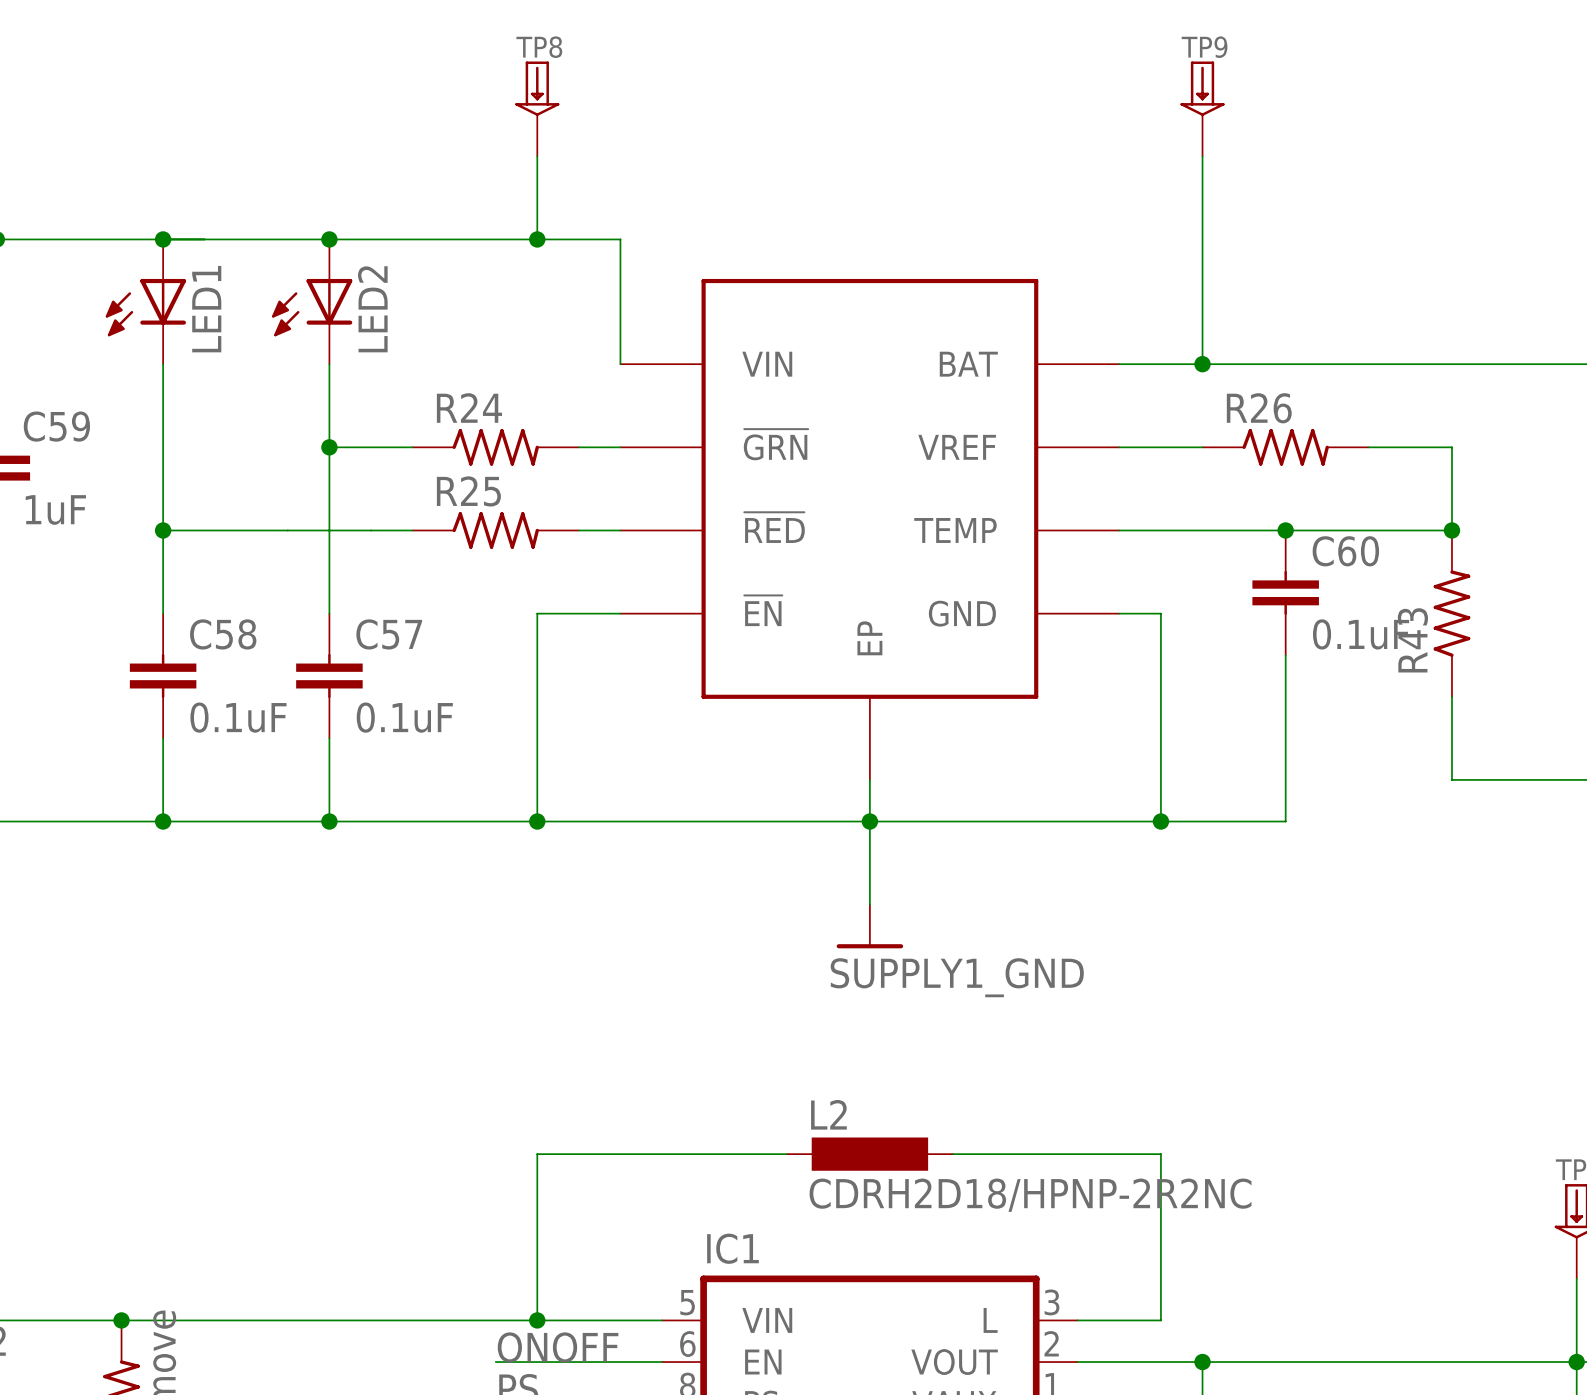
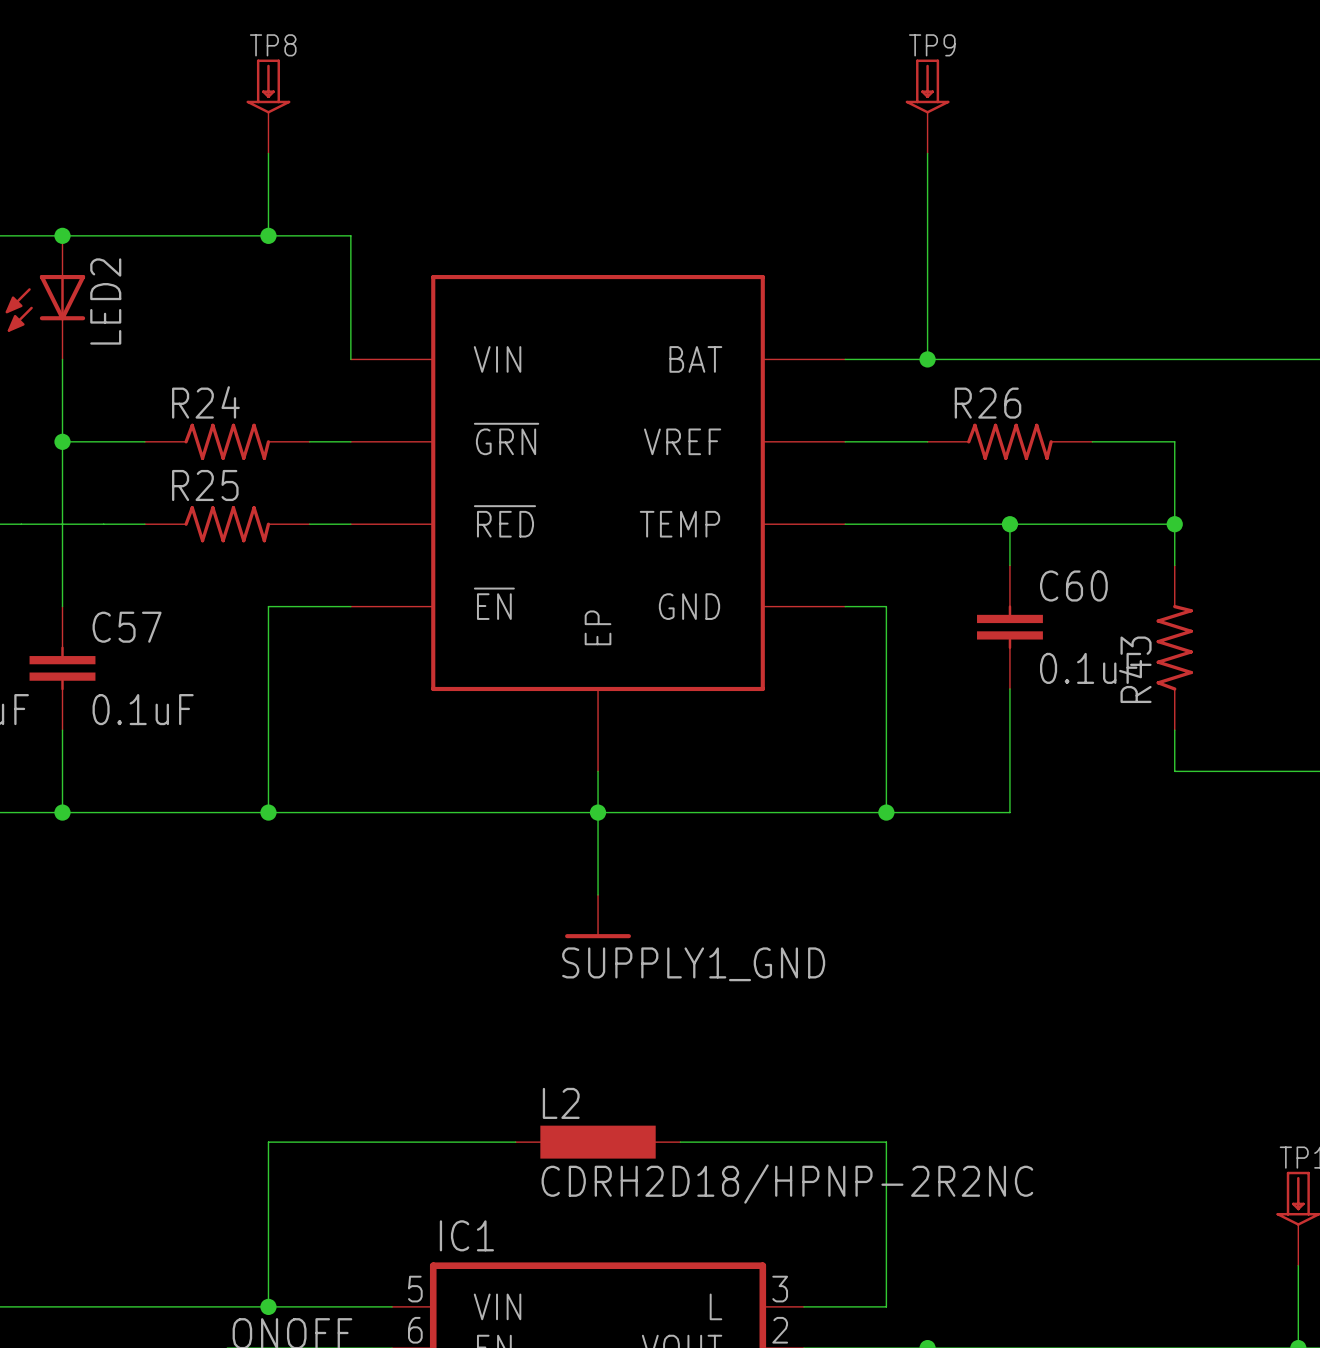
C60 position: (1285, 592) -> (1009, 627)
R43 position: (1451, 613) -> (1174, 647)

